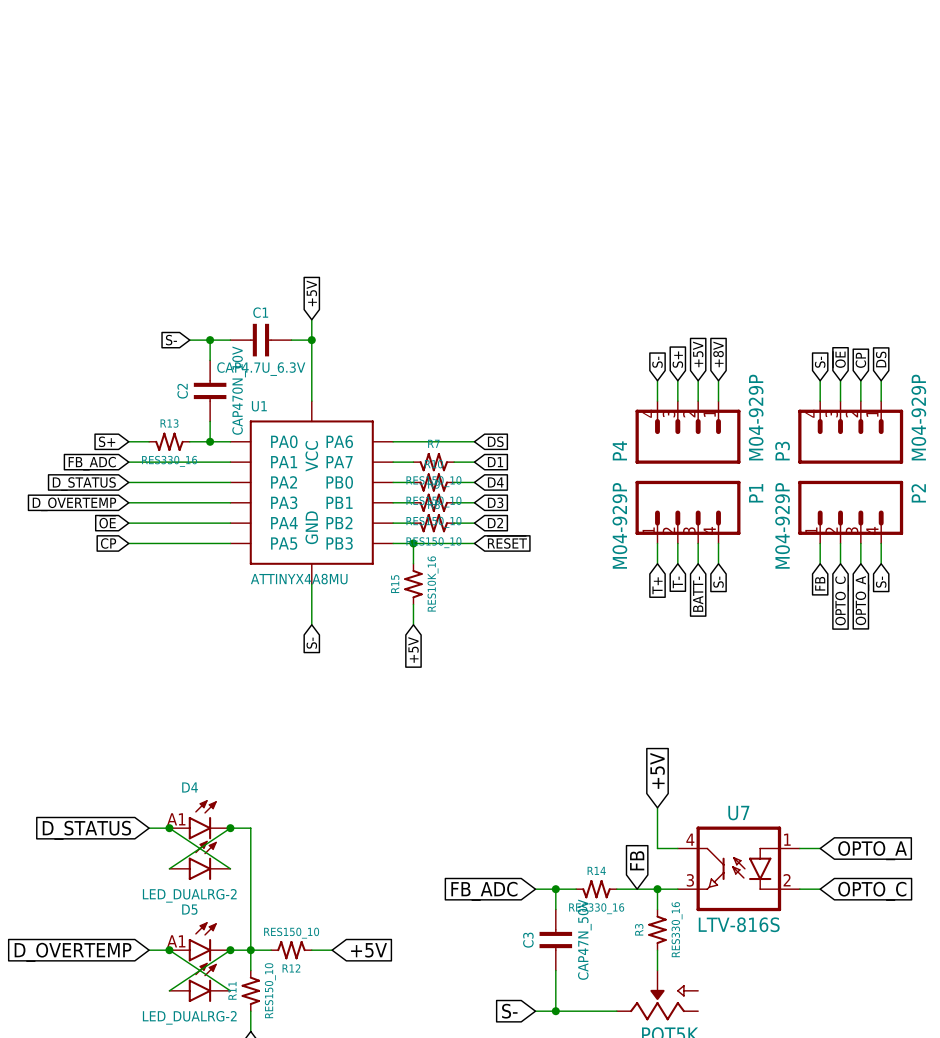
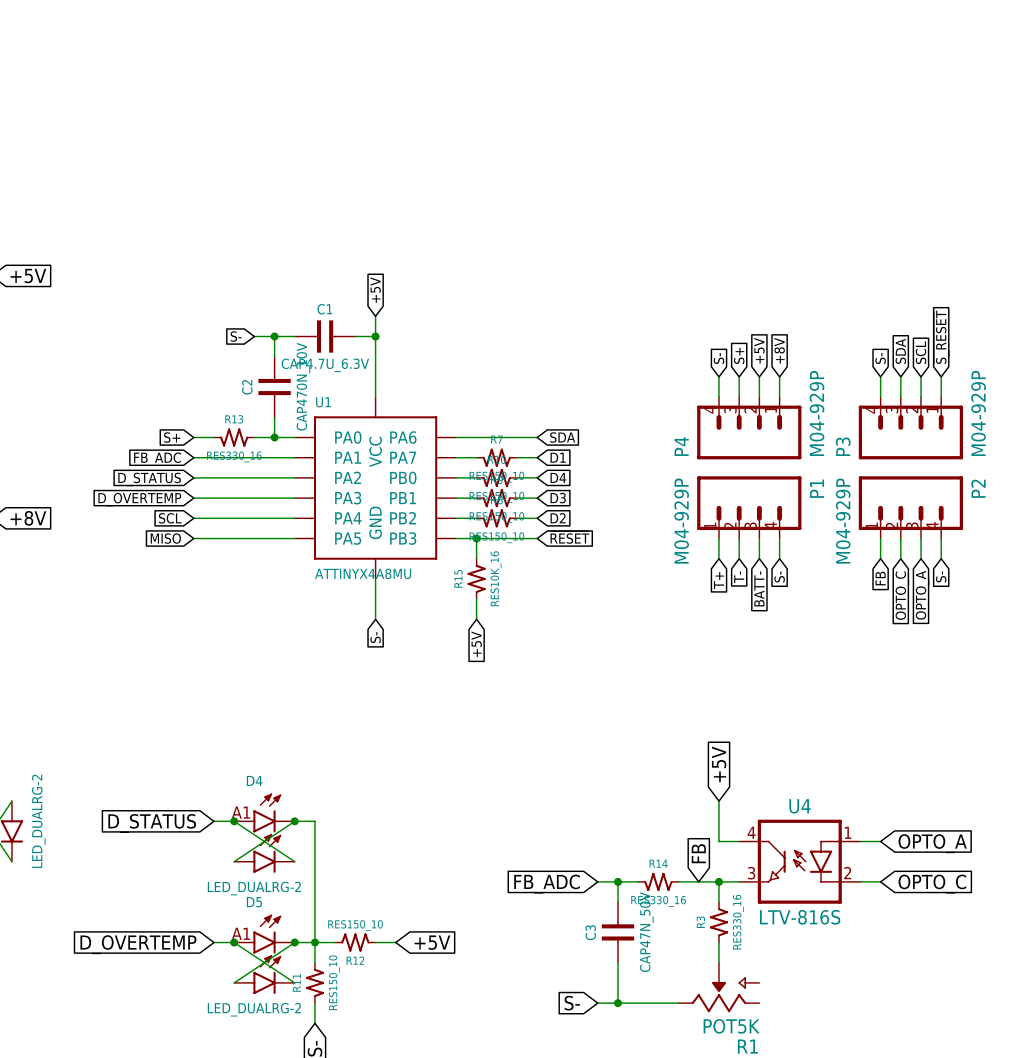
global label: ~{OE} (839, 359) -> SDA (900, 351)
global label: DS (881, 359) -> ~{S_RESET} (941, 337)
global label: CP (860, 360) -> SCL (921, 352)
global label: DS (495, 441) -> SDA (562, 437)
global label: ~{OE} (107, 522) -> SCL (170, 518)
global label: CP (108, 543) -> MISO (165, 538)
U7 name: U7 (738, 813) -> U4 (800, 806)

